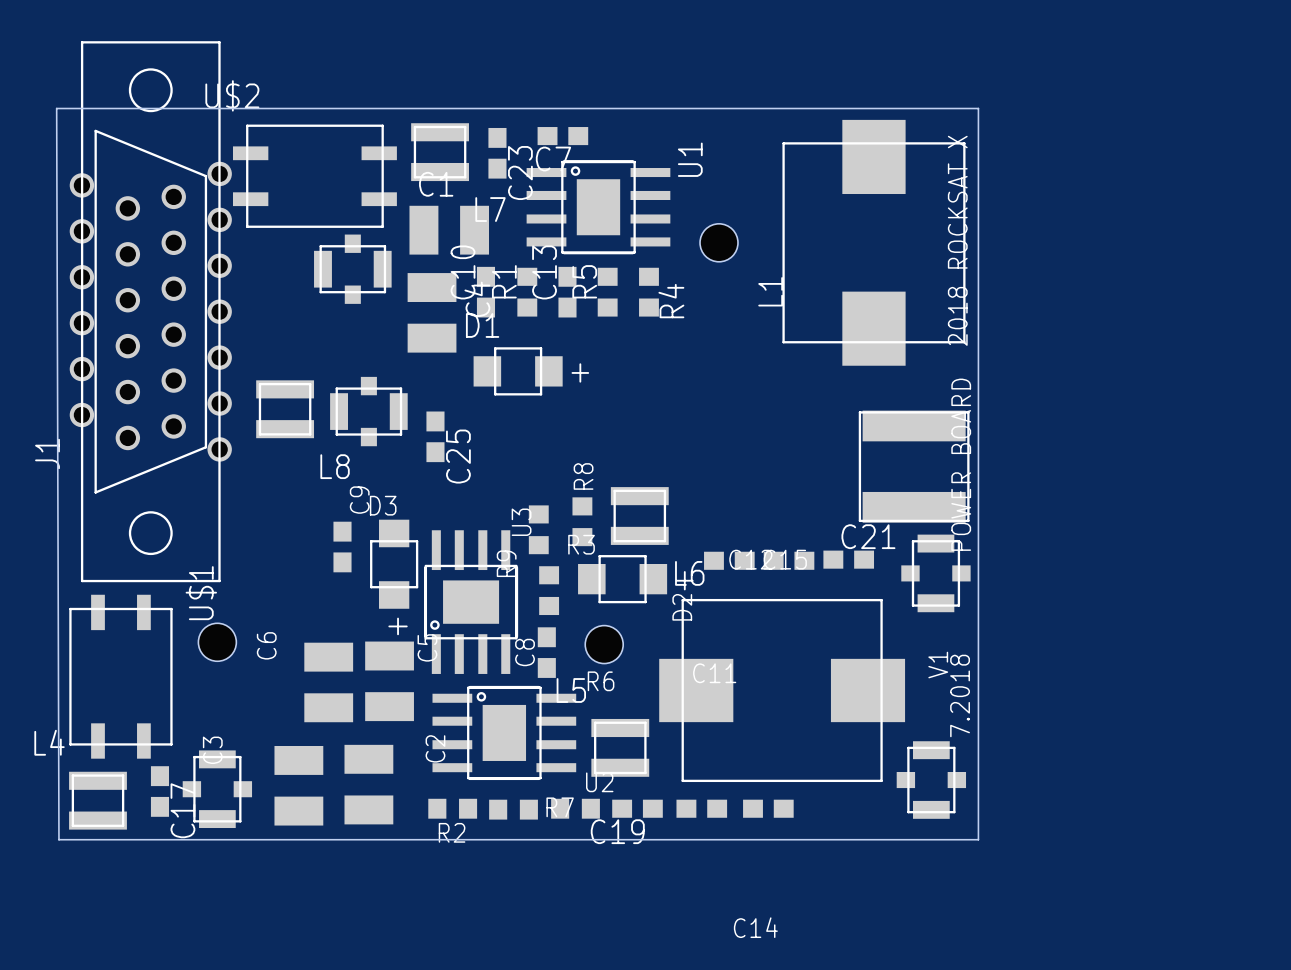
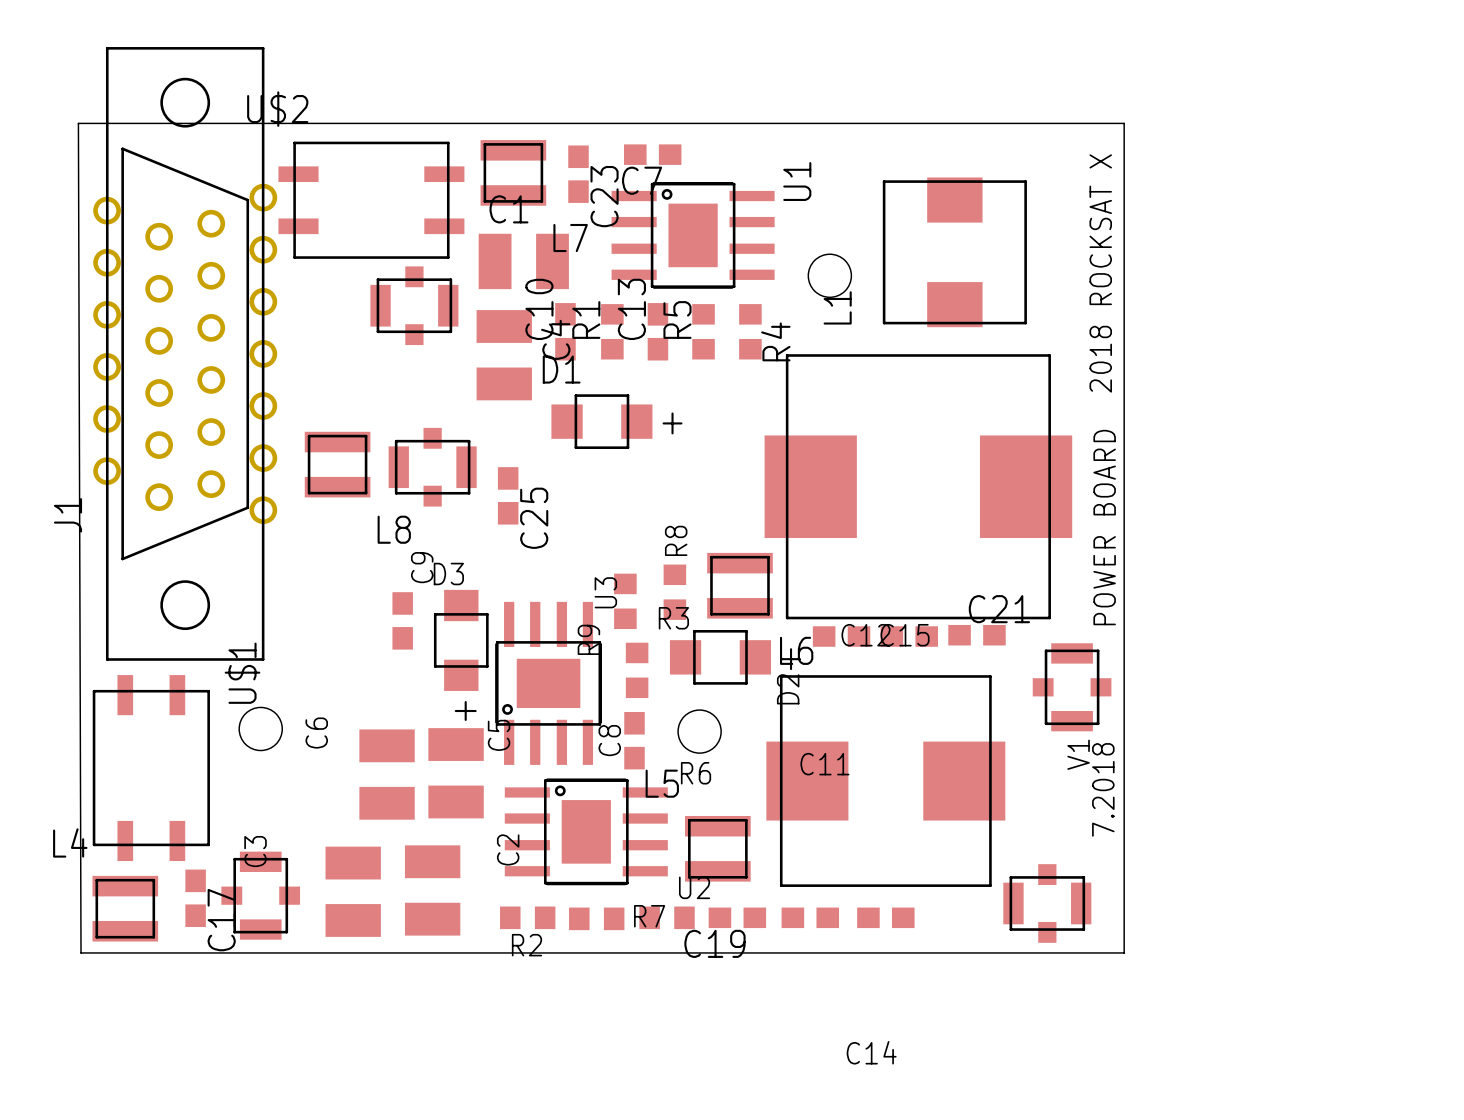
L1 footprint: [782, 119, 966, 366] -> [882, 177, 1027, 328]
part: none -> (918, 486)
part: (914, 466) -> none
part position: (935, 573) -> (1072, 687)
part footprint: [659, 598, 906, 783] -> [766, 675, 1006, 887]
part rotation: 0° (931, 780) -> 90° clockwise (1047, 903)

